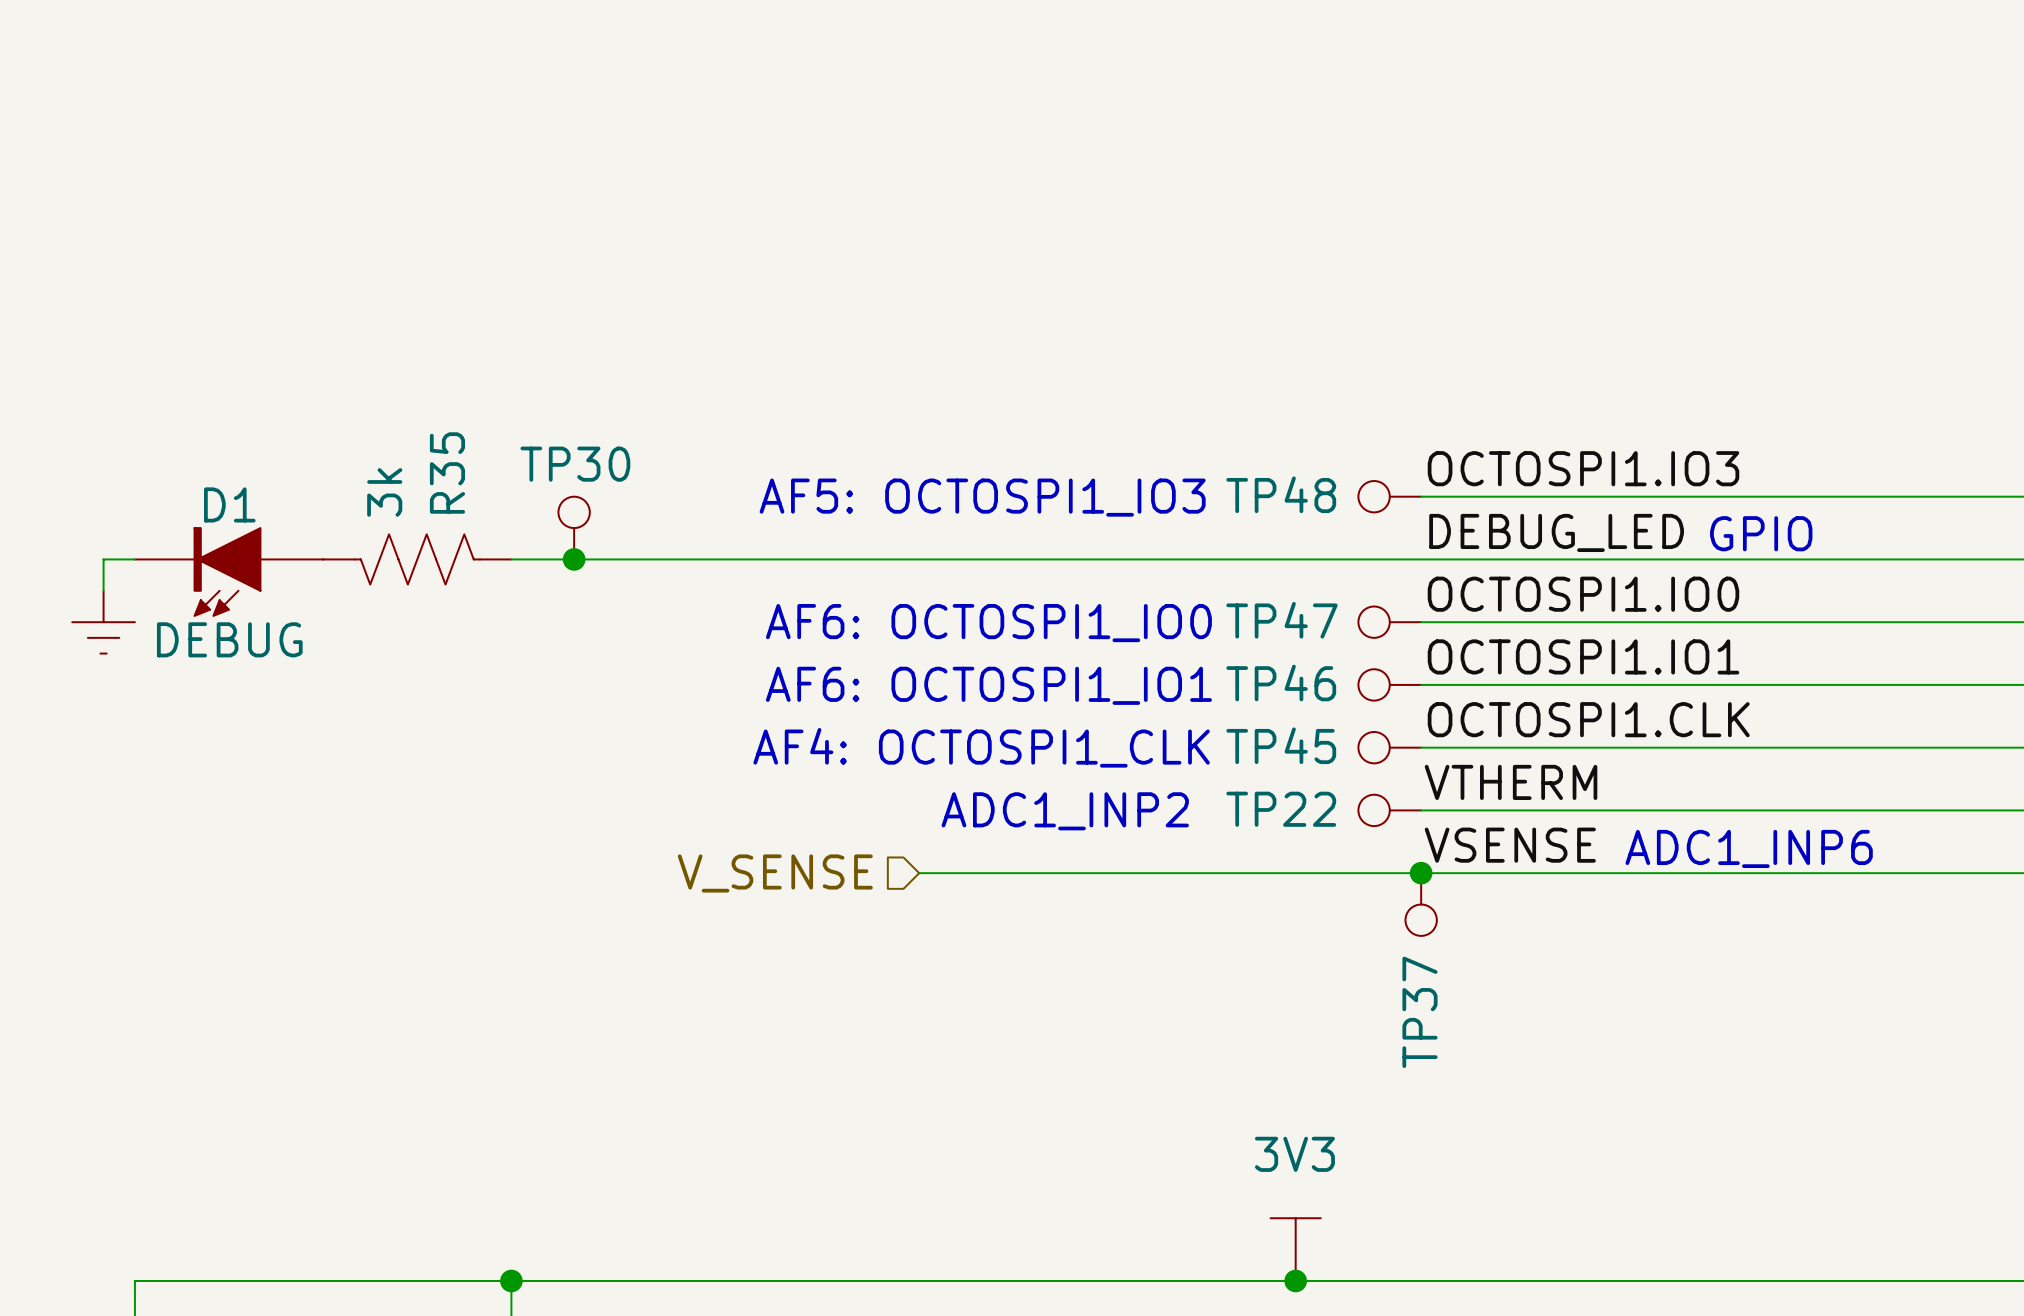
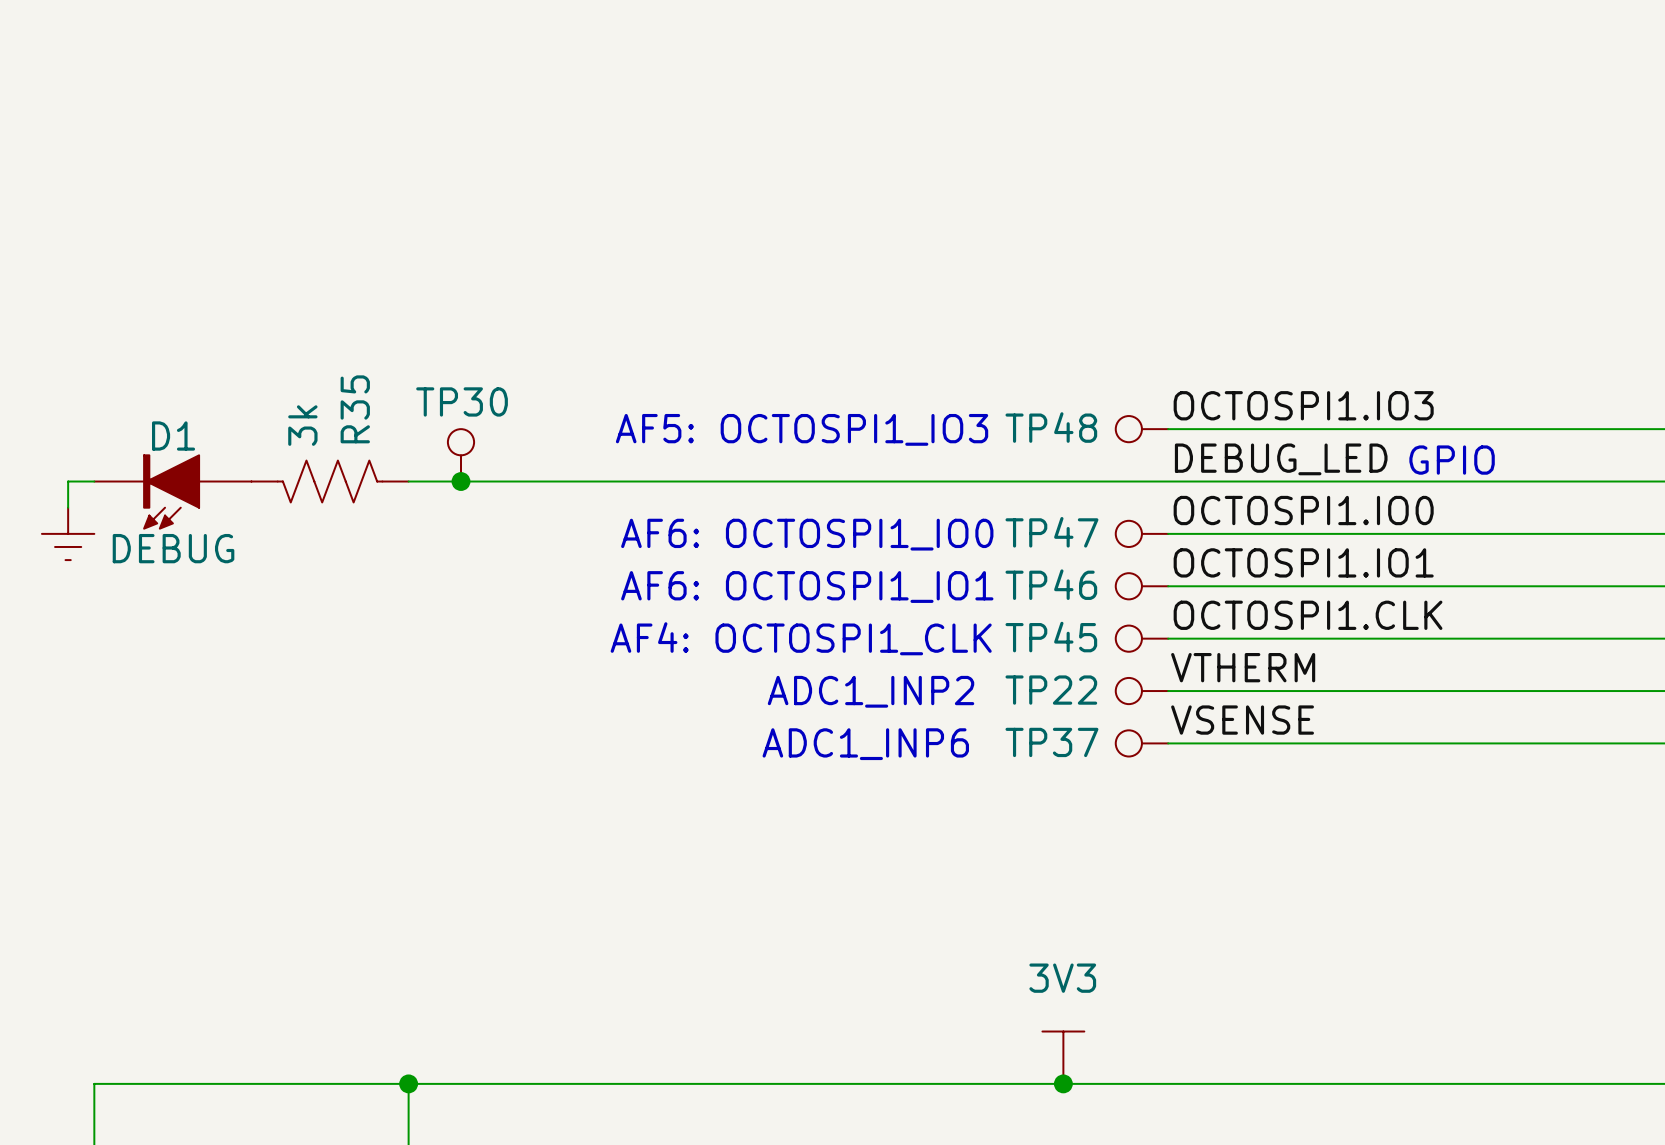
text: ADC1_INP6 (1749, 848) -> none
hierarchical label: V_SENSE (775, 873) -> none
wire: (919, 873) (1421, 873) -> none
junction: (1421, 873) -> none
text: none -> ADC1_INP6 (865, 744)
TP37 position: (1421, 904) -> (1141, 743)
TP37 rotation: 0° (1421, 920) -> 90° clockwise (1128, 743)

